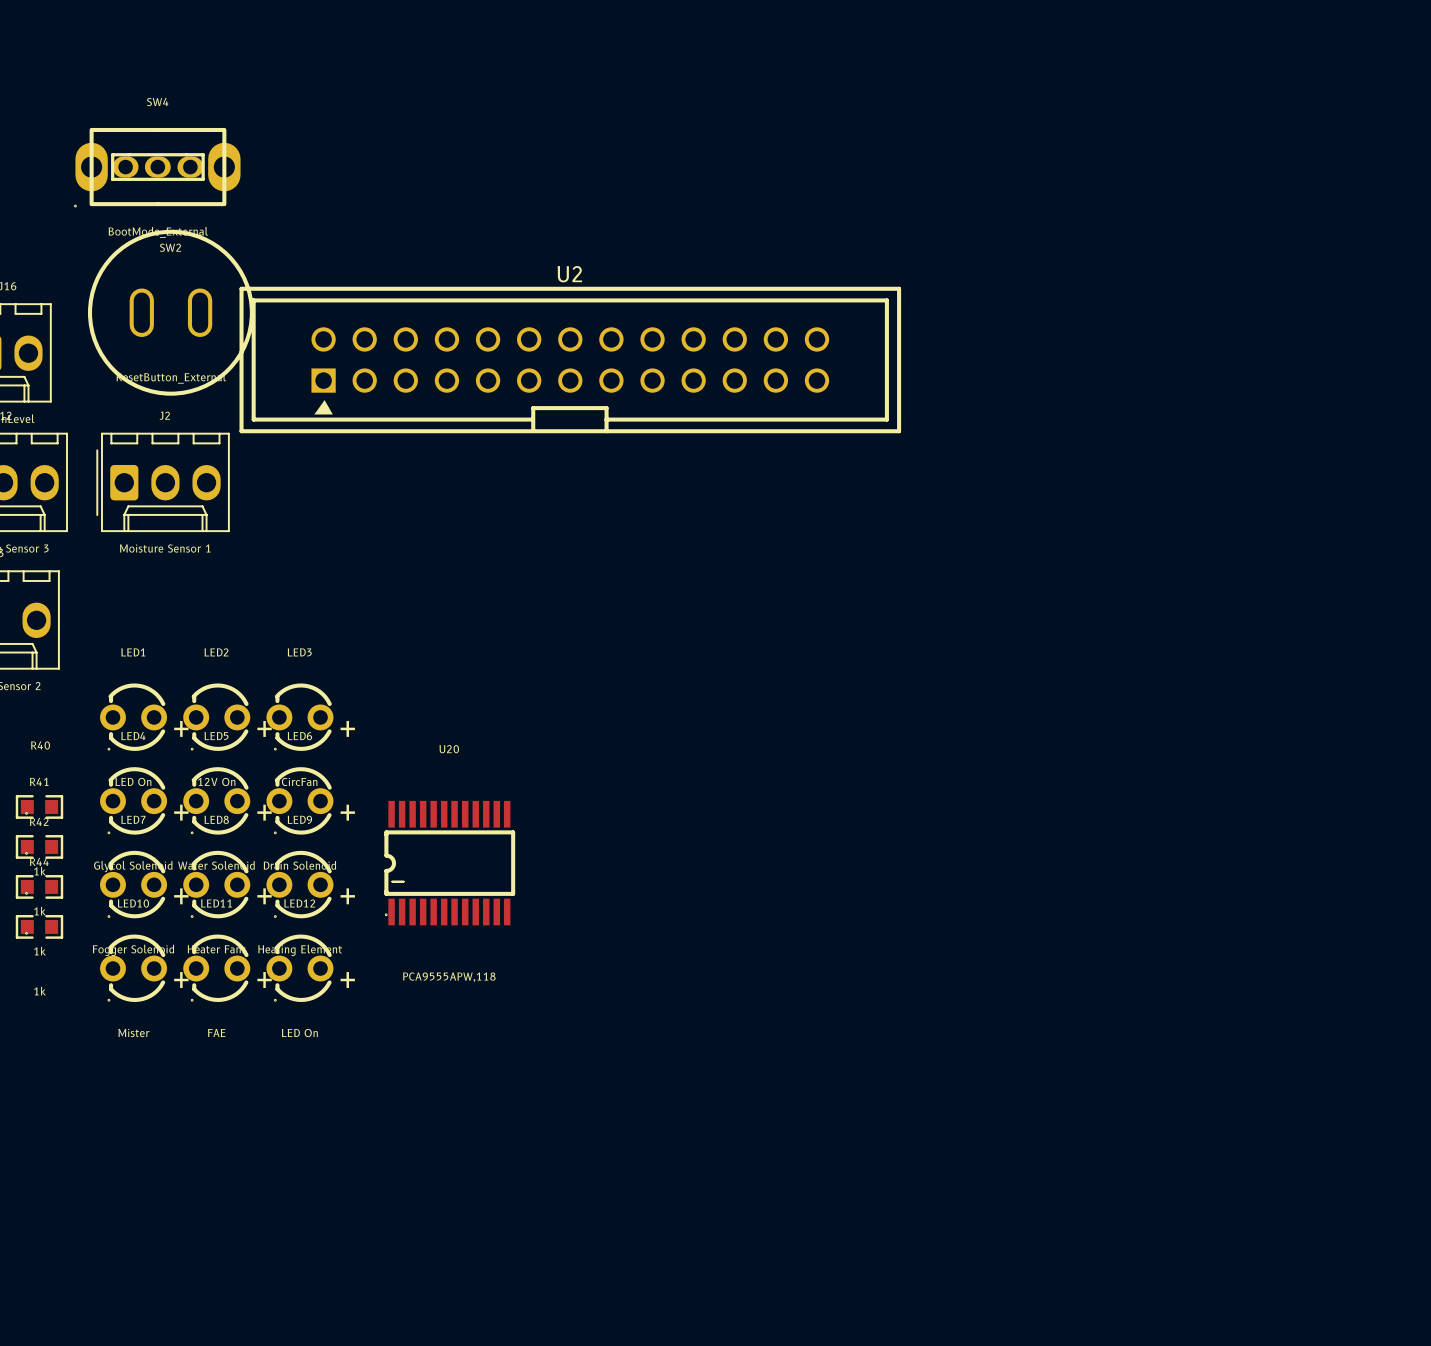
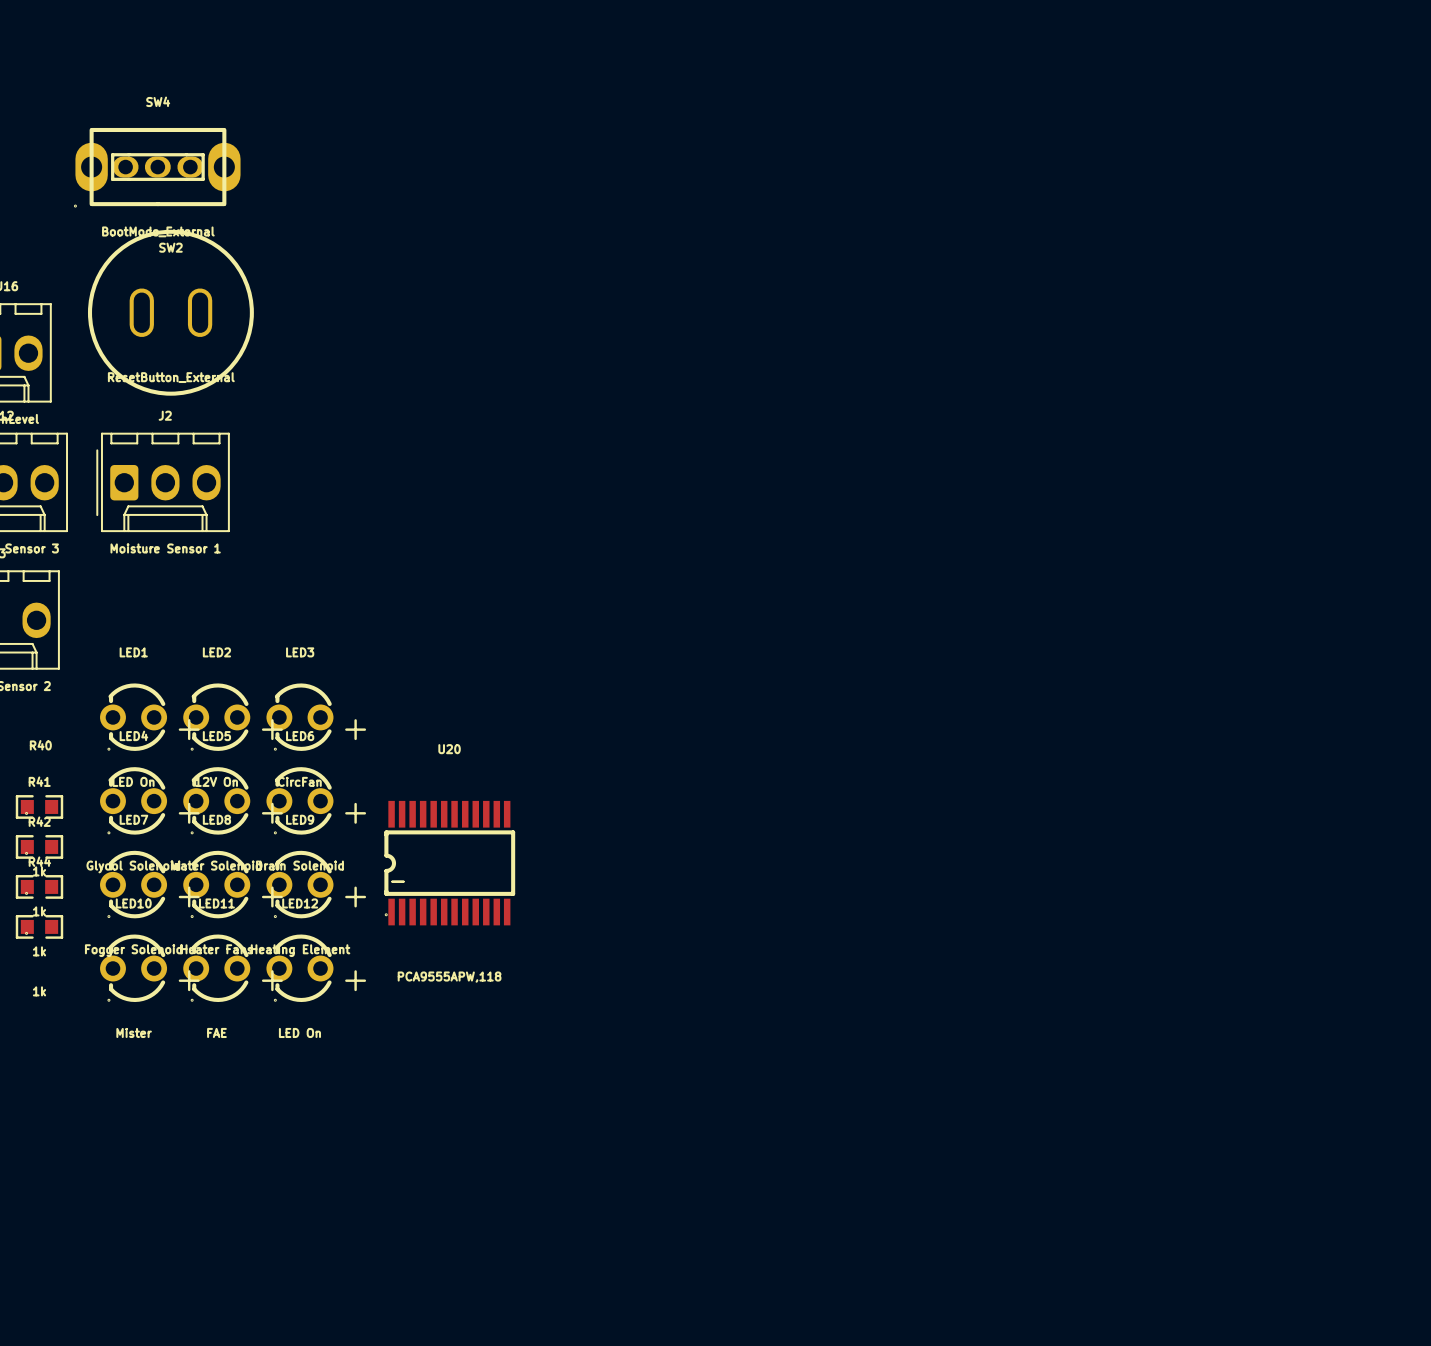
U2: (570, 360) -> none

